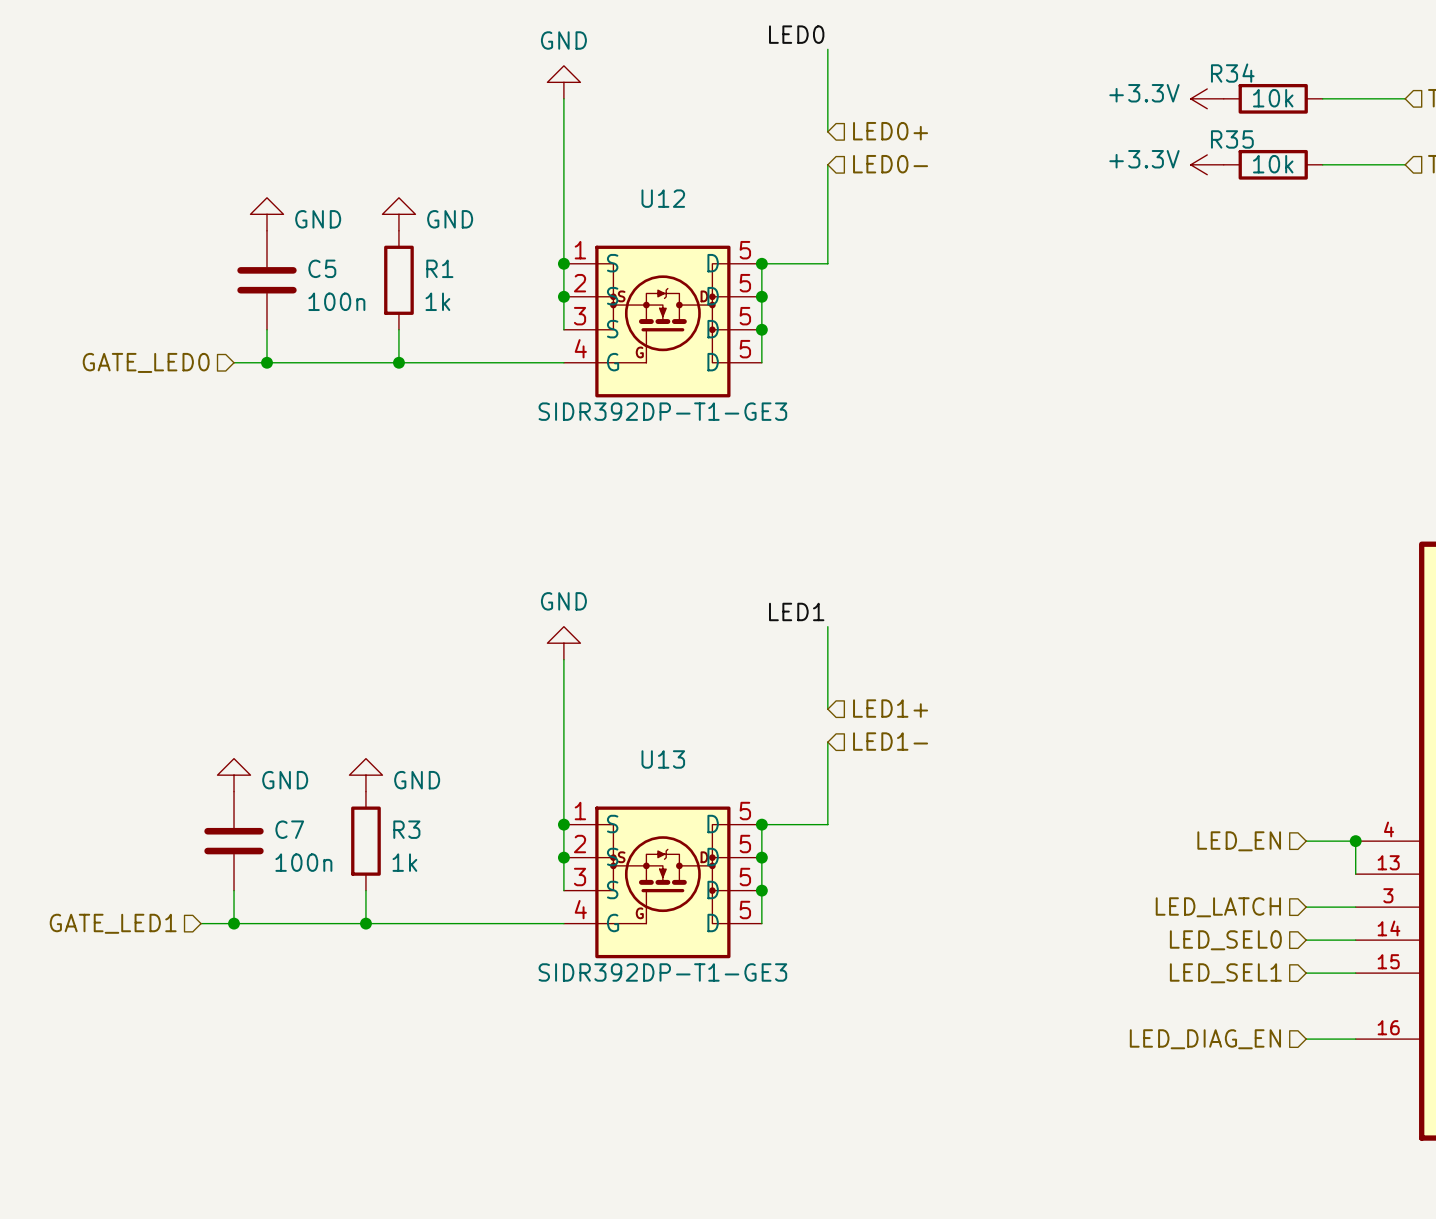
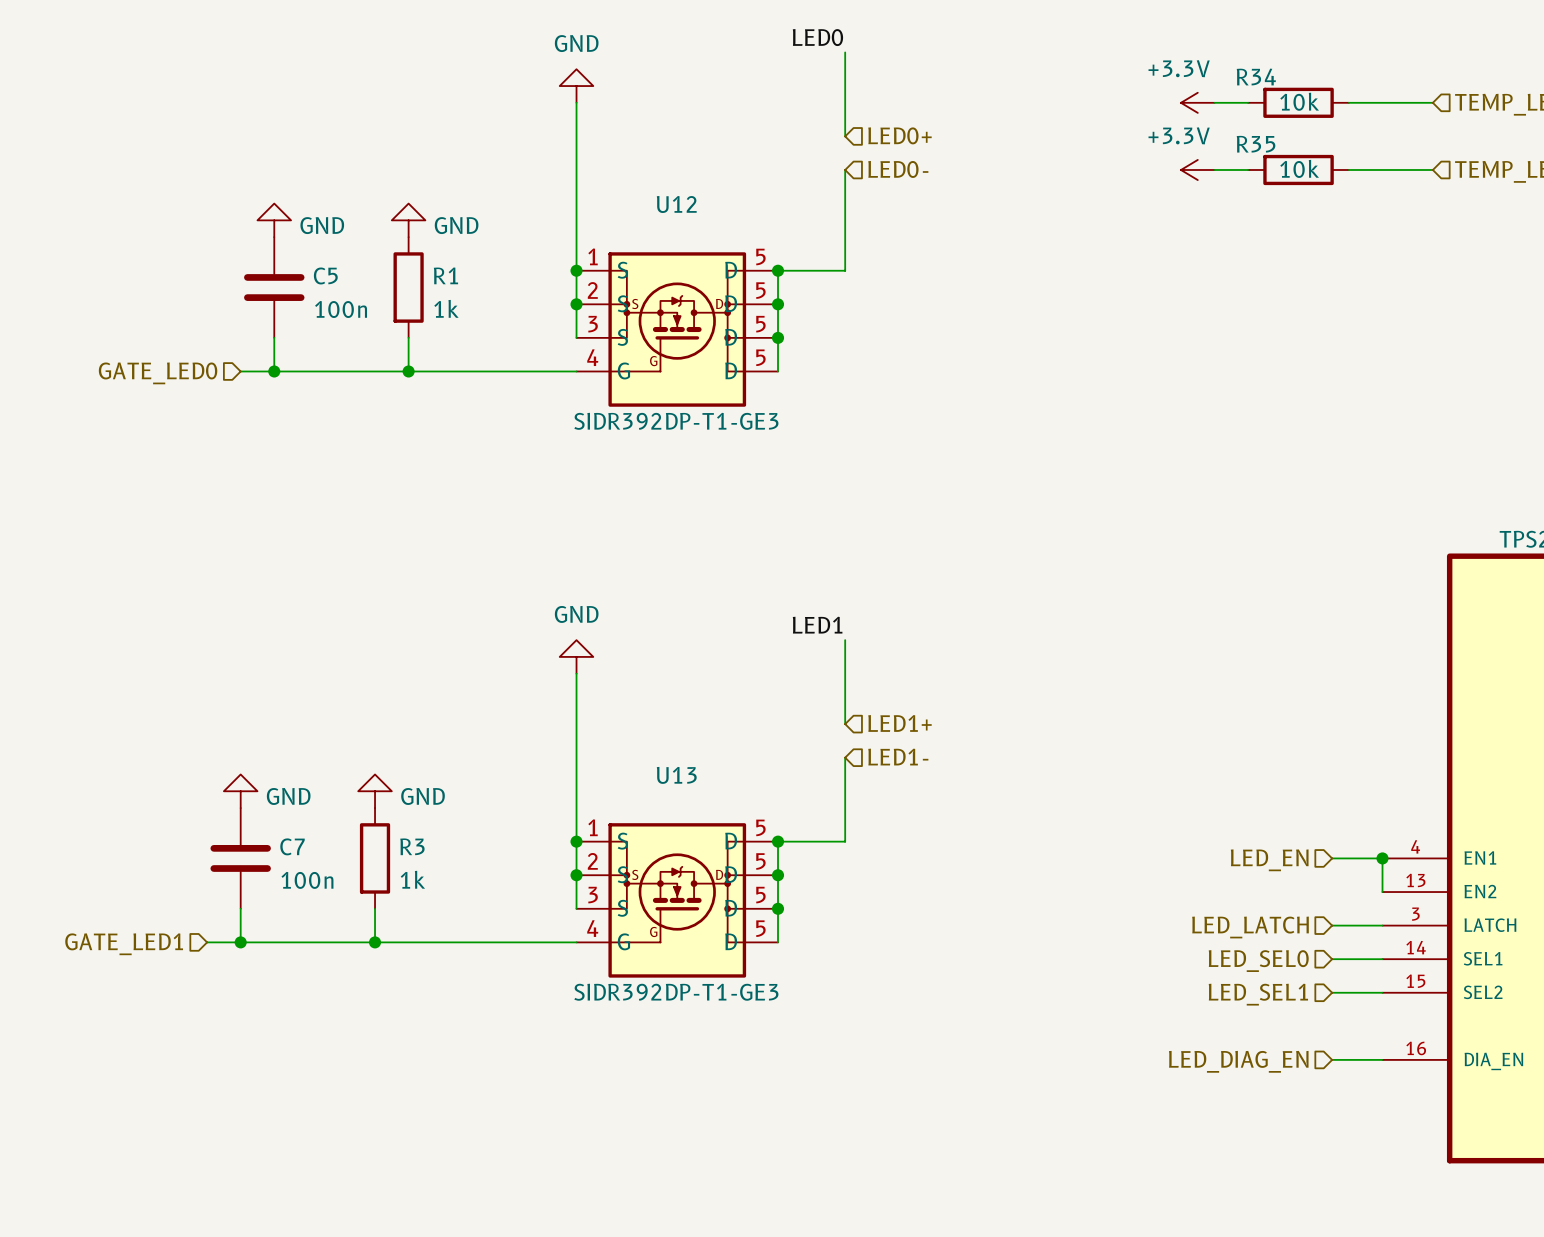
power symbol text position: +3.3V (1144, 93) -> +3.3V (1179, 68)
power symbol position: +3.3V (1207, 98) -> +3.3V (1197, 102)
power symbol text position: +3.3V (1144, 159) -> +3.3V (1179, 135)
power symbol position: +3.3V (1207, 164) -> +3.3V (1197, 169)

